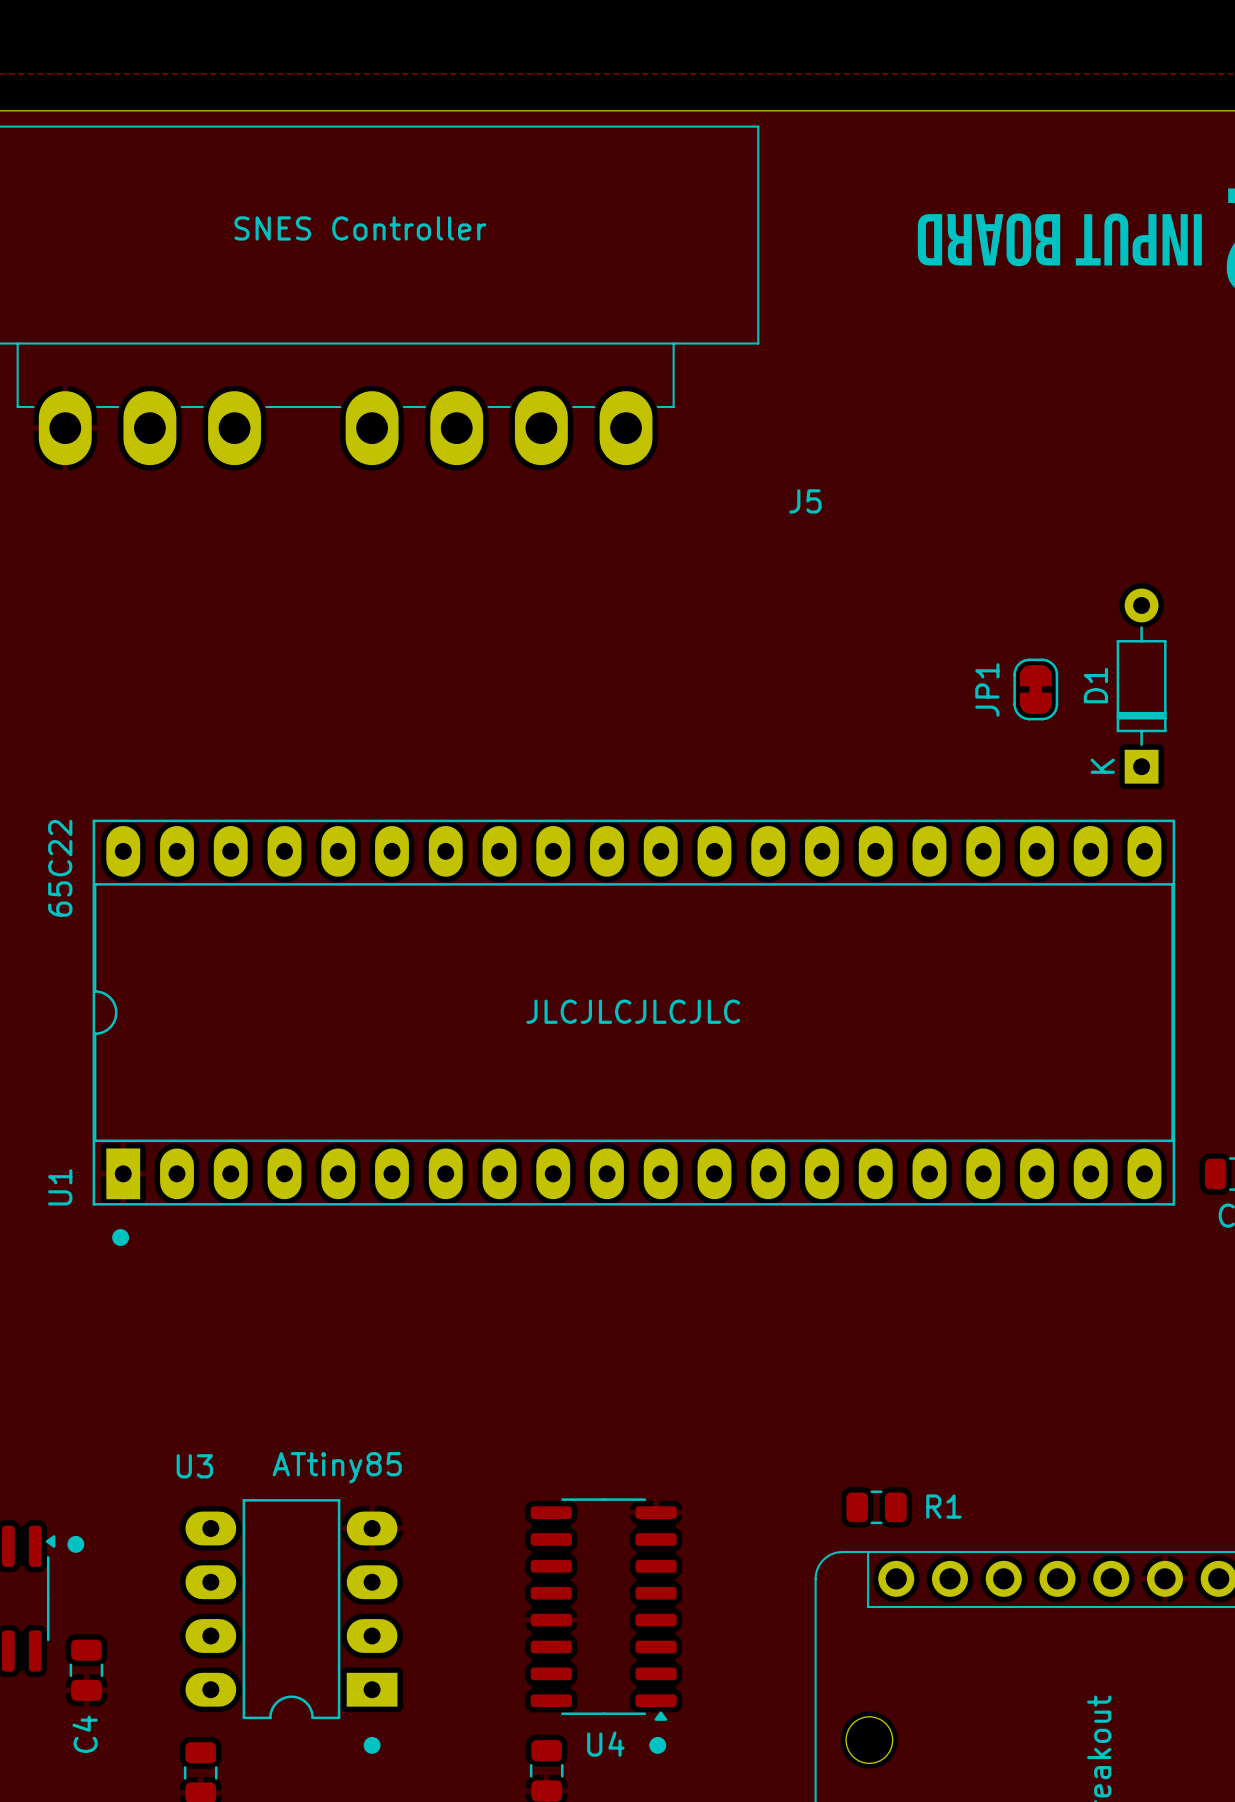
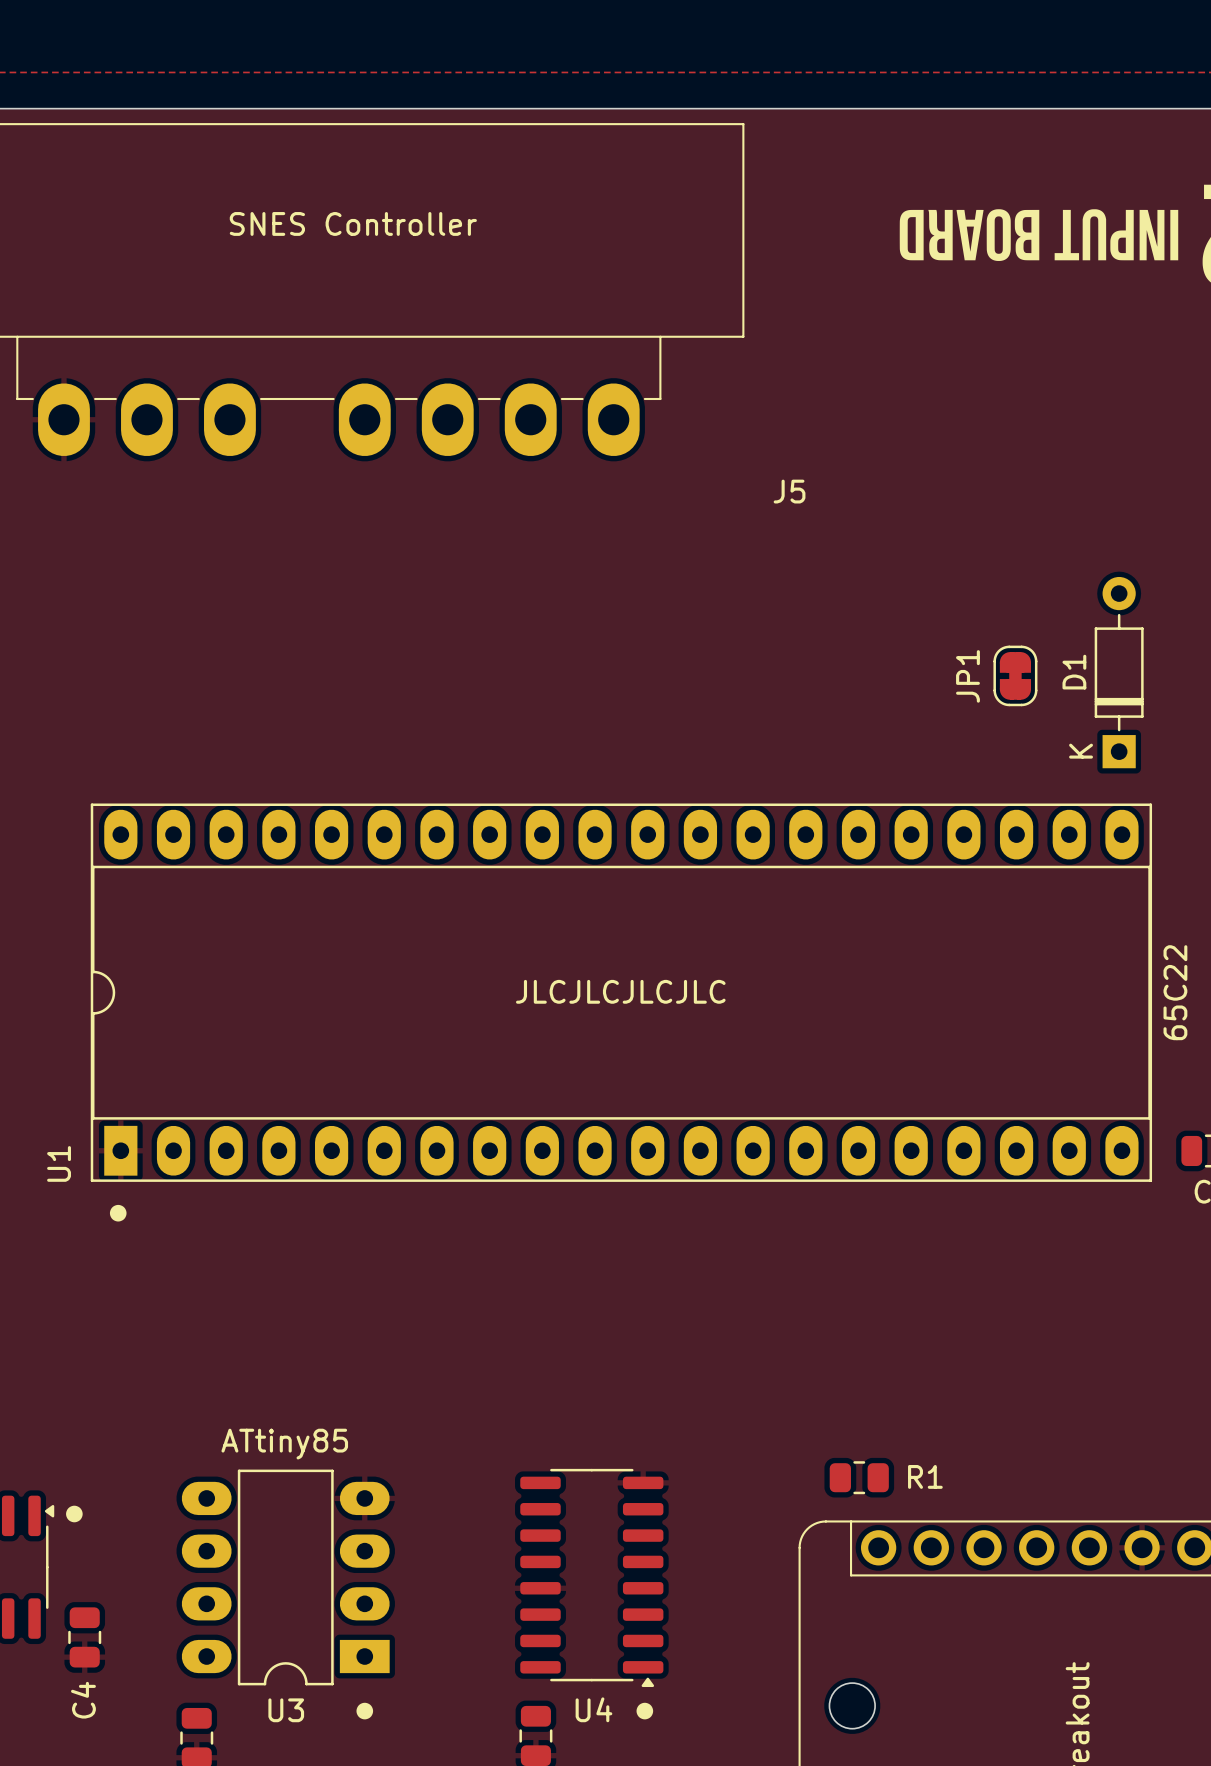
U1 value position: 65C22 (60, 868) -> 65C22 (1175, 992)
U3 name position: U3 (194, 1466) -> U3 (286, 1710)
U3 value position: ATtiny85 (337, 1467) -> ATtiny85 (284, 1444)

